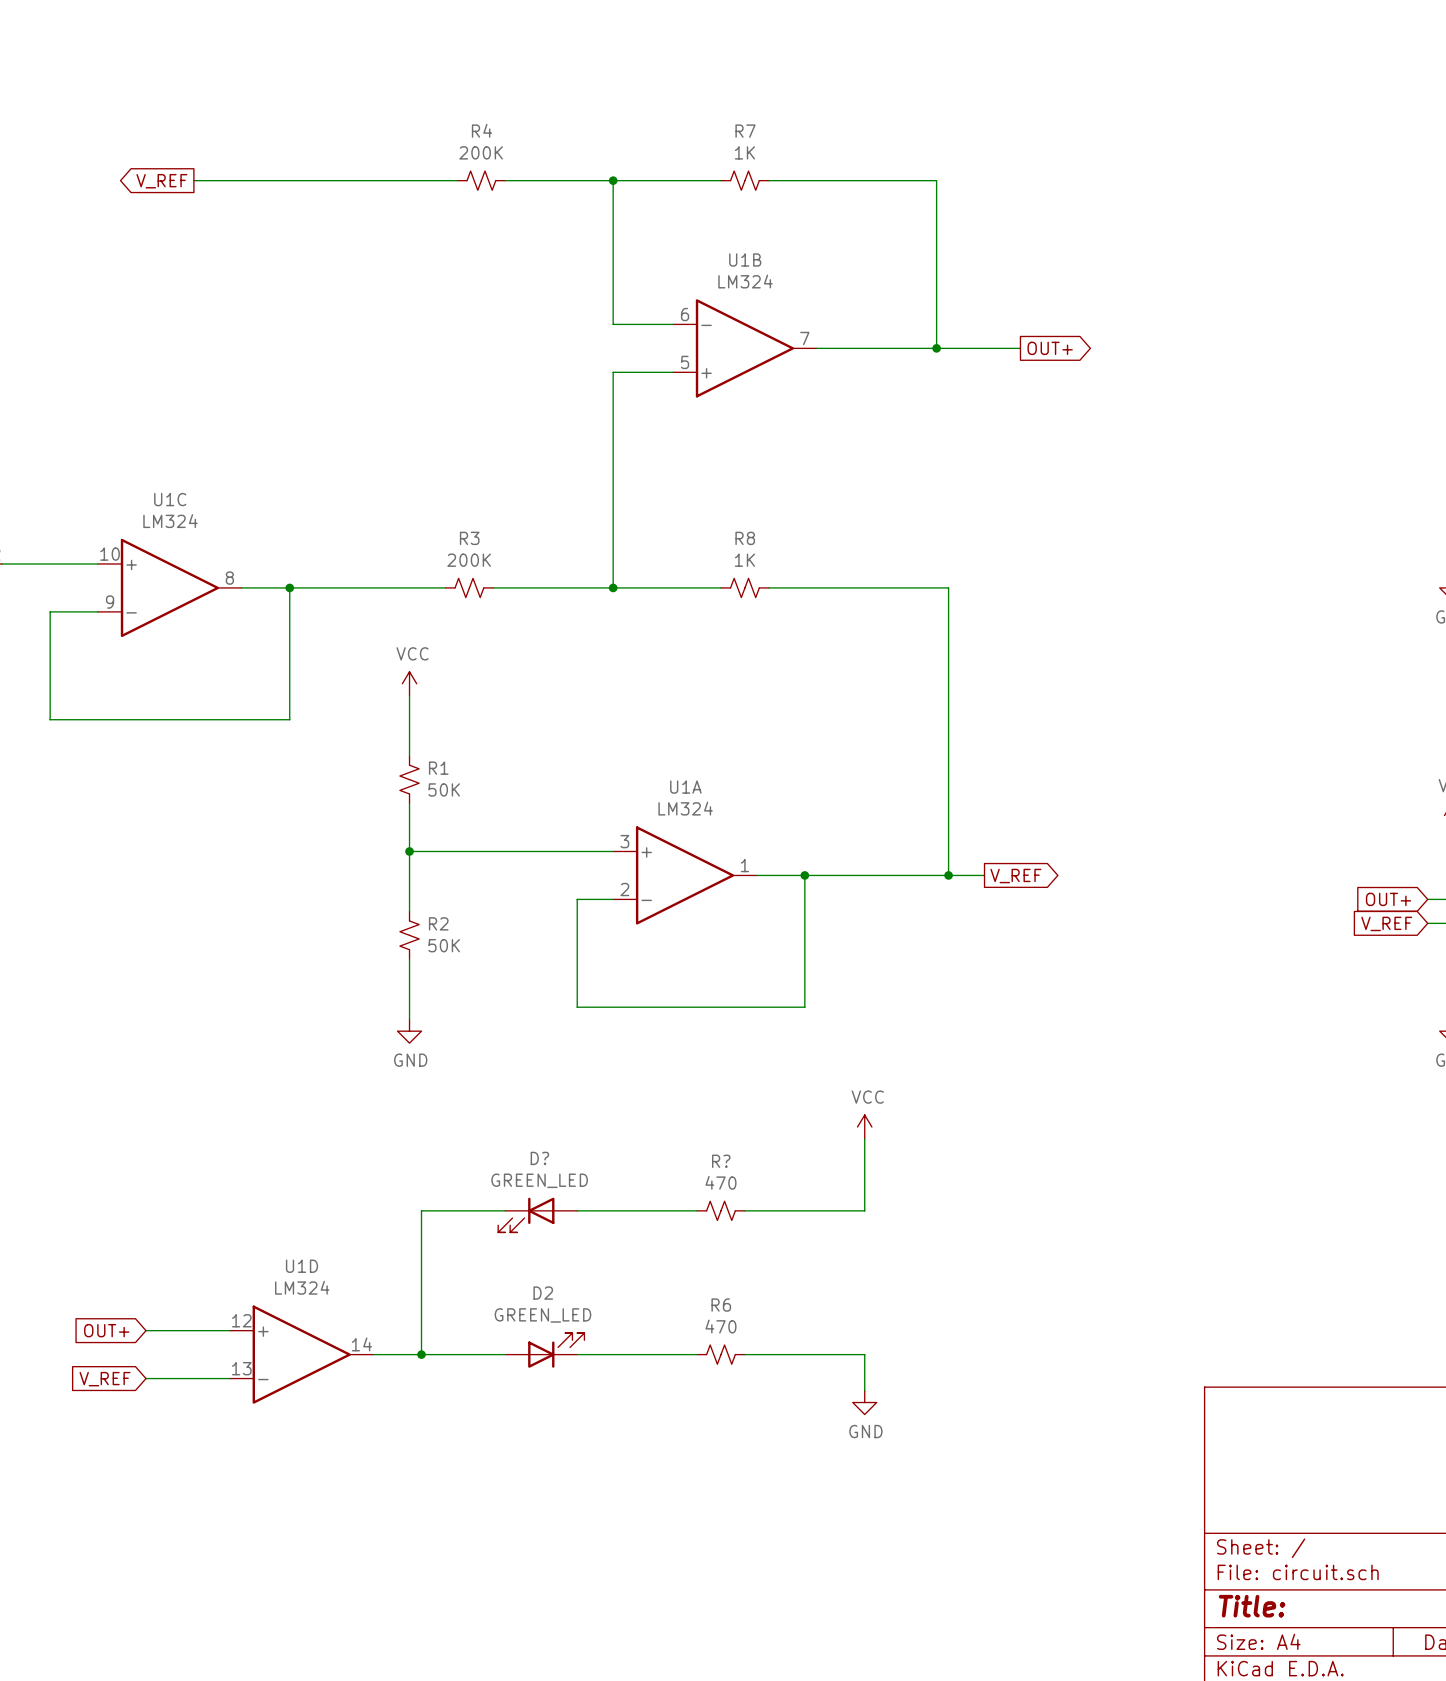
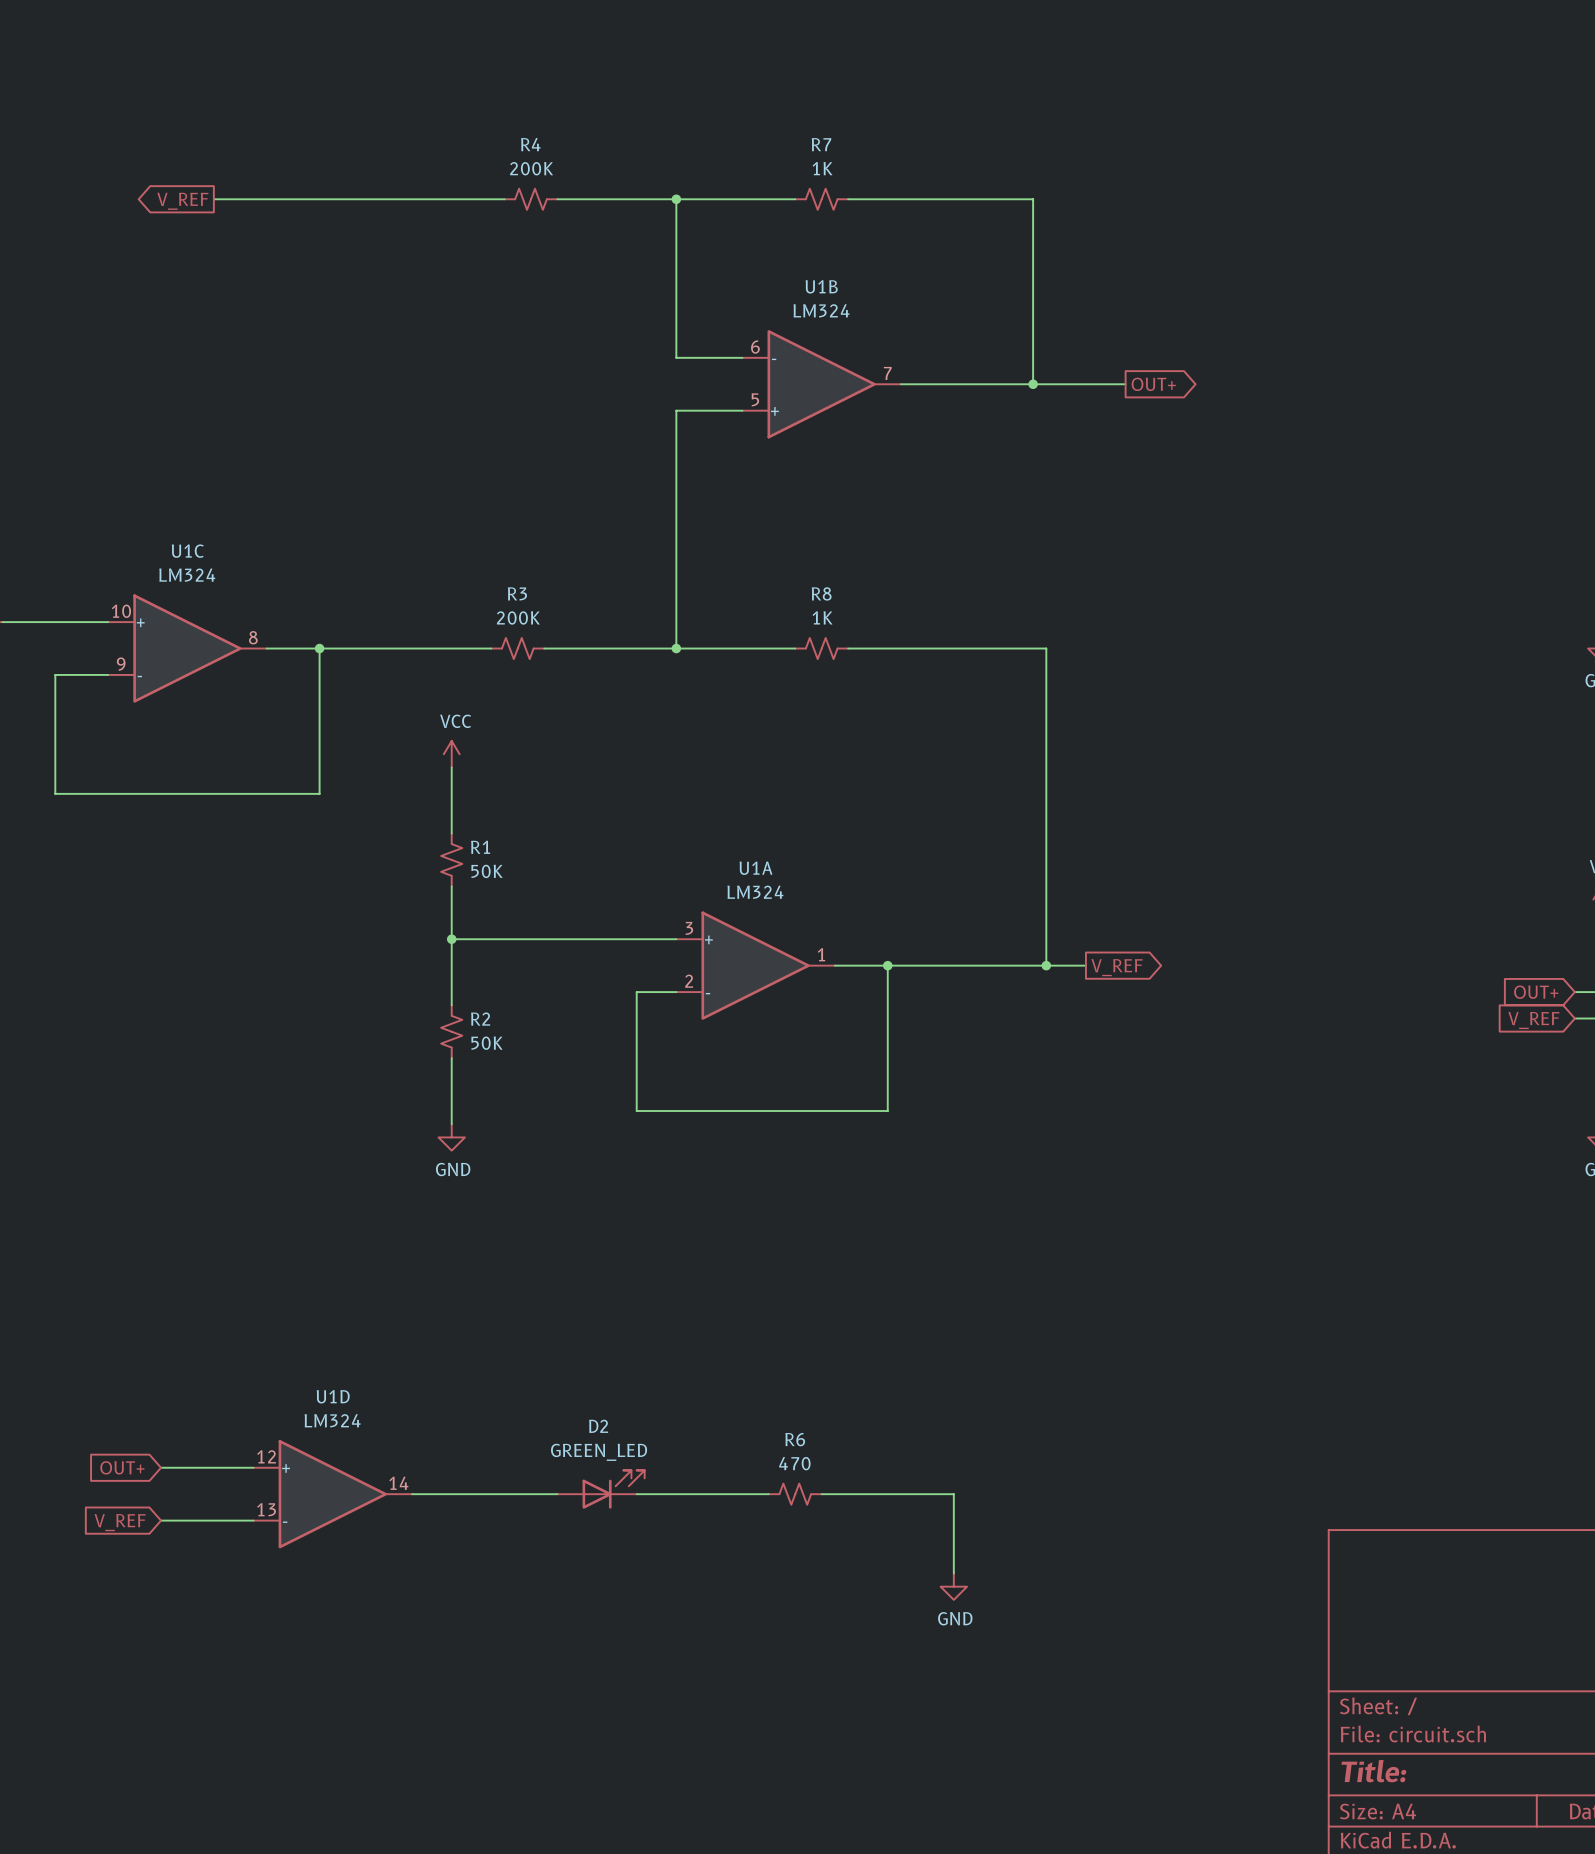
power symbol: VCC (864, 1127) -> none
wire: (864, 1138) (864, 1210) (744, 1210) -> none
wire: (505, 1210) (421, 1210) (421, 1354) -> none
wire: (577, 1210) (697, 1210) -> none
R?: 470 (720, 1210) -> none
D?: GREEN_LED (537, 1215) -> none
junction: (421, 1354) -> none
wire: none -> (953, 1533) (953, 1573)
power symbol position: GND (864, 1402) -> GND (953, 1586)

